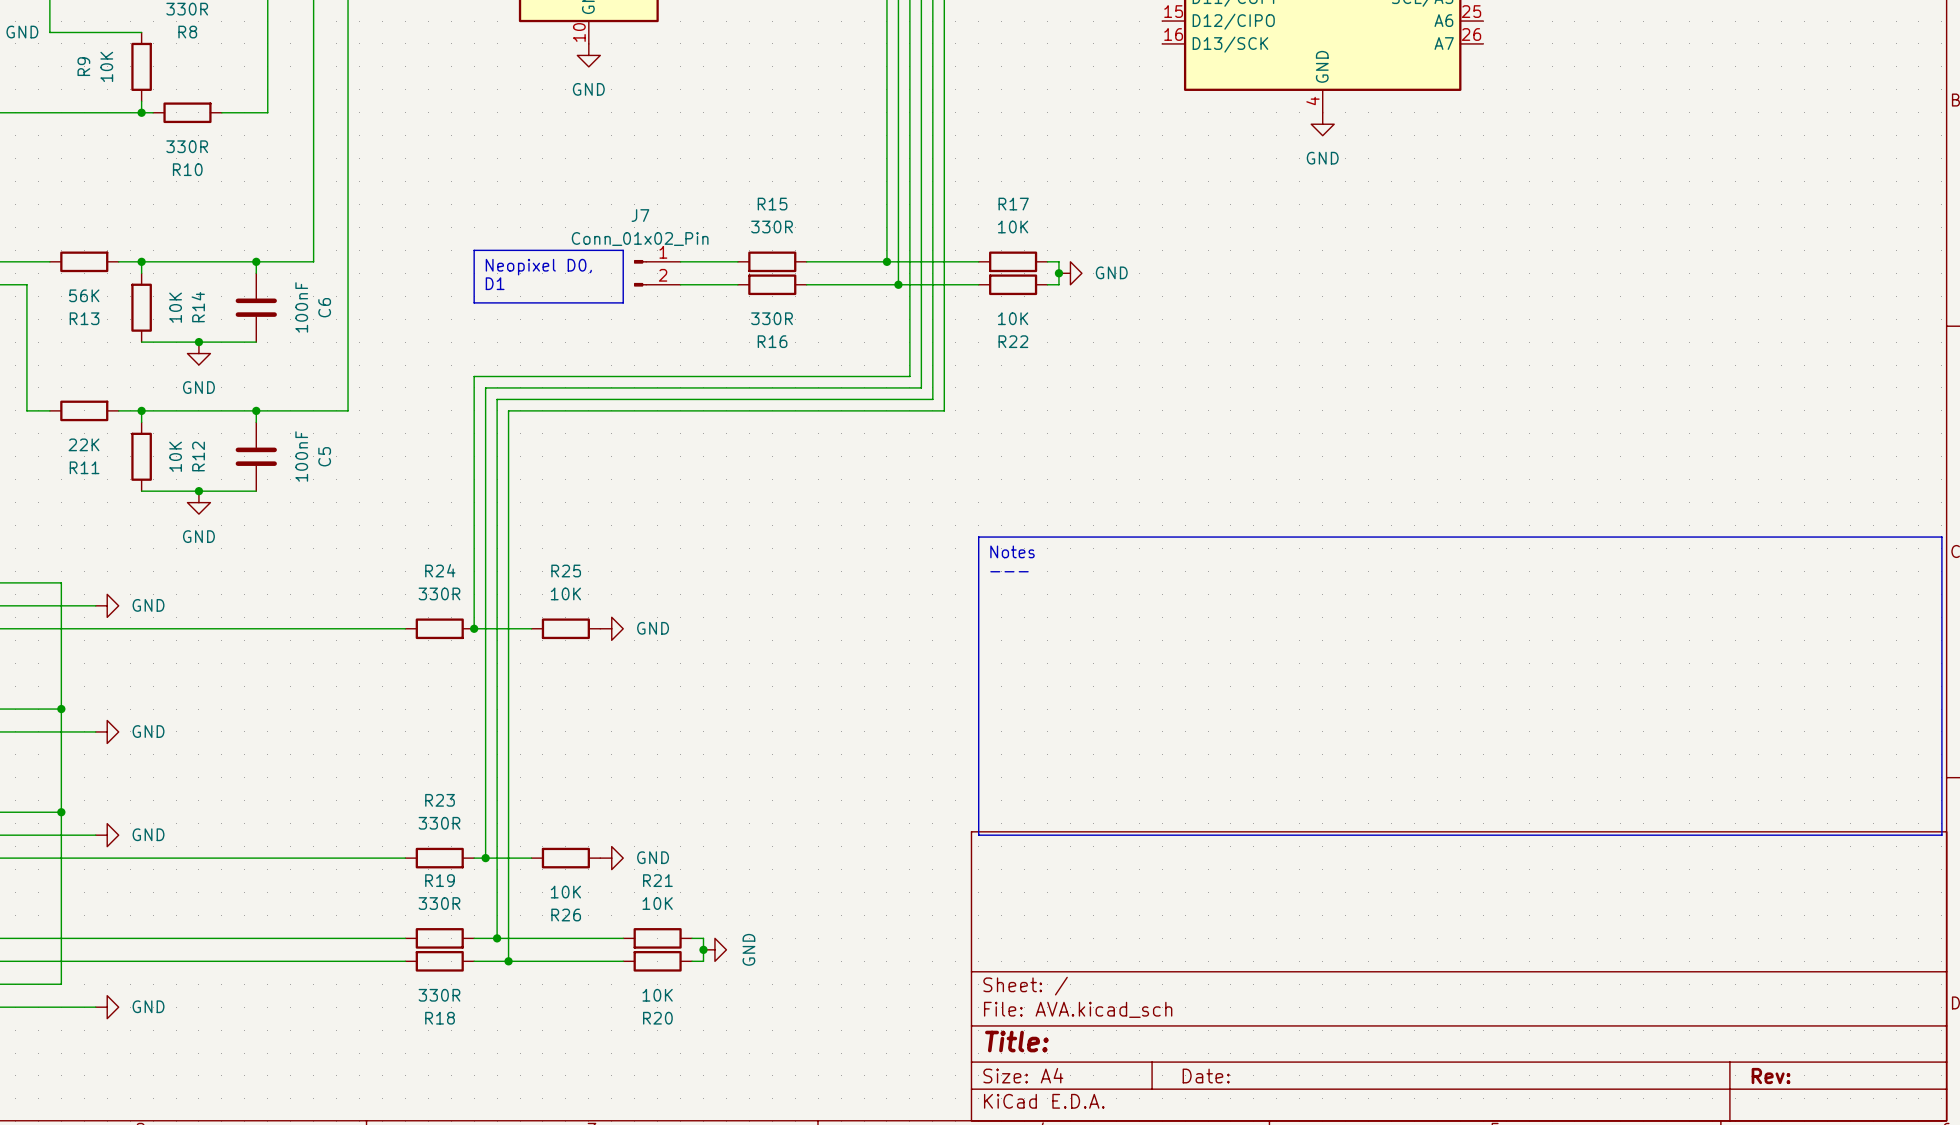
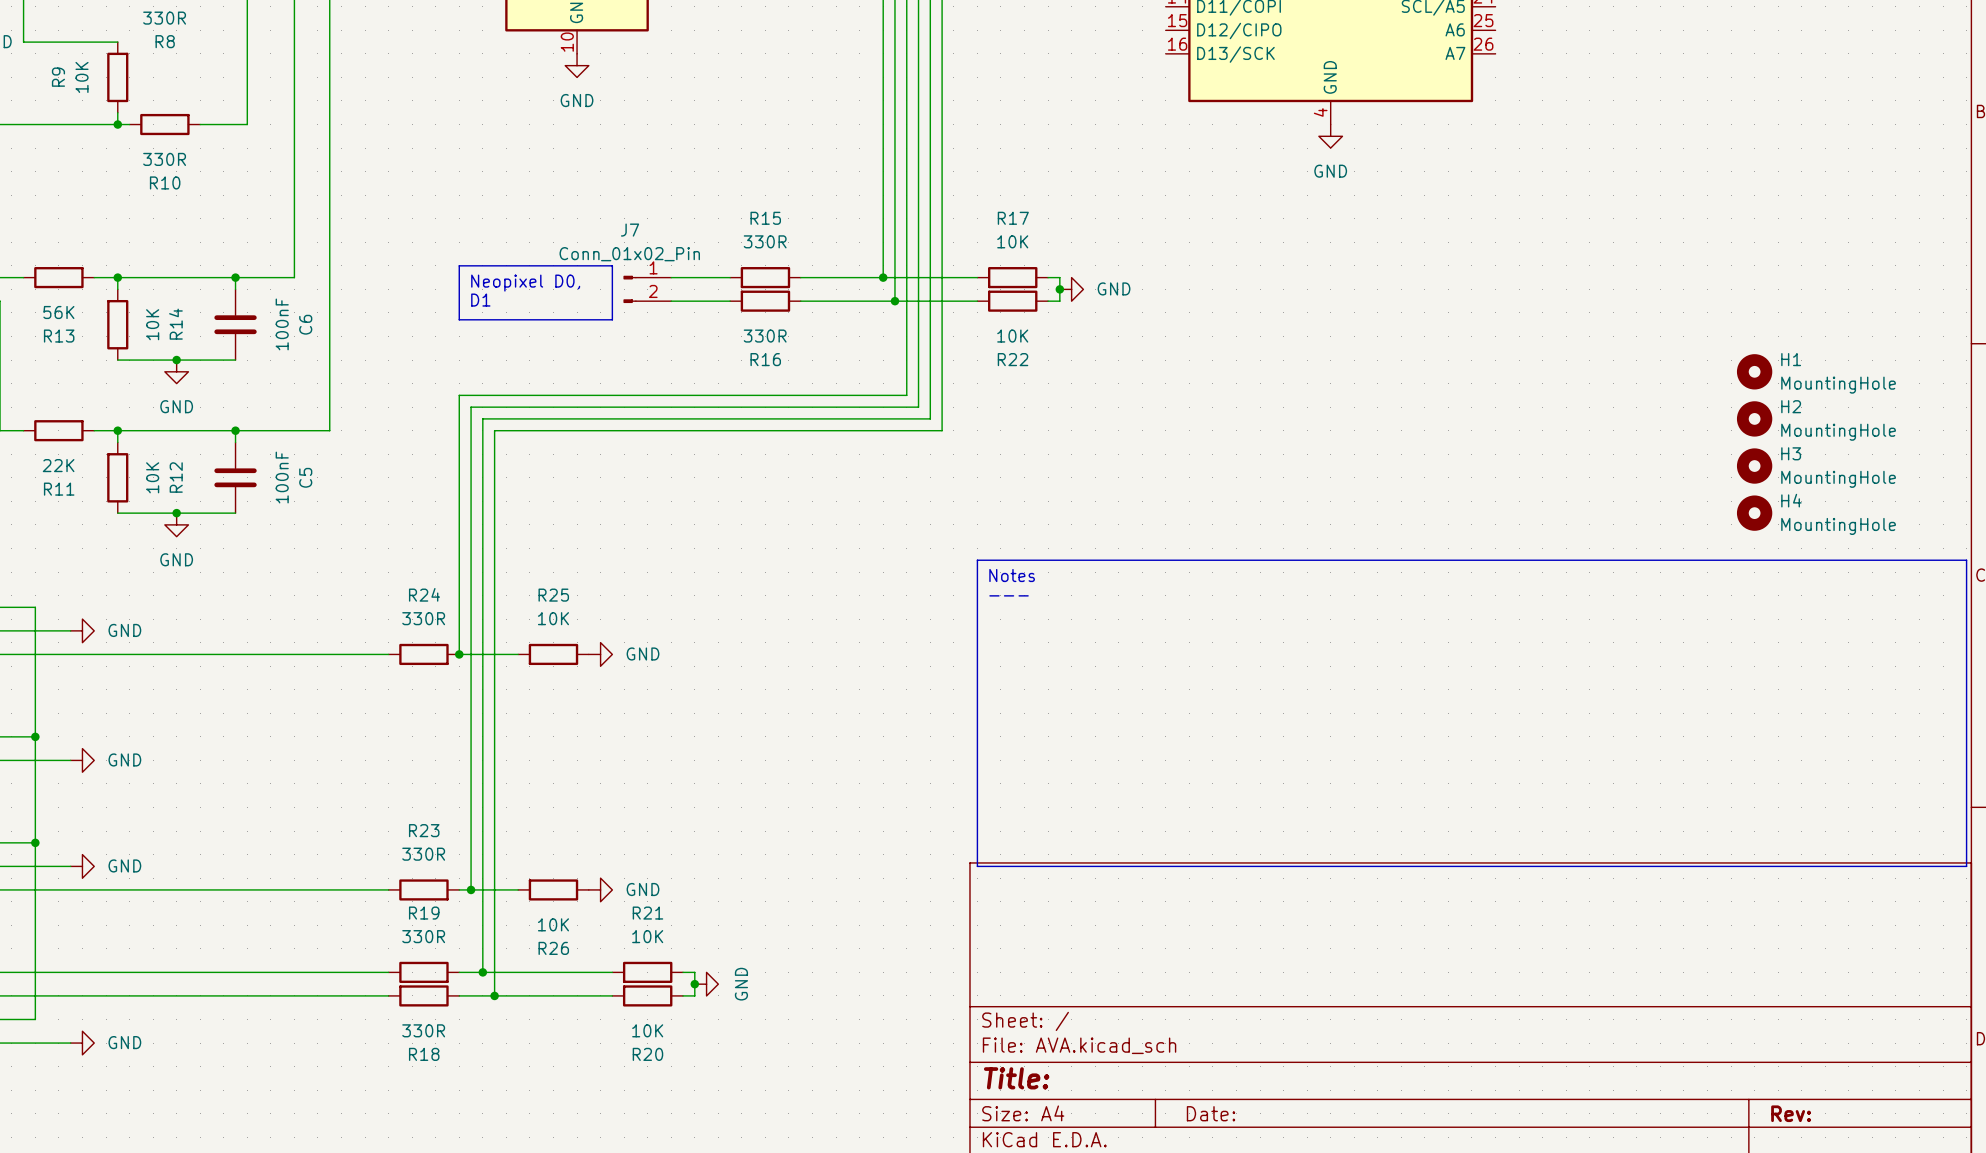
H1: none -> MountingHole (1754, 371)
H2: none -> MountingHole (1754, 418)
H3: none -> MountingHole (1754, 466)
H4: none -> MountingHole (1754, 513)

